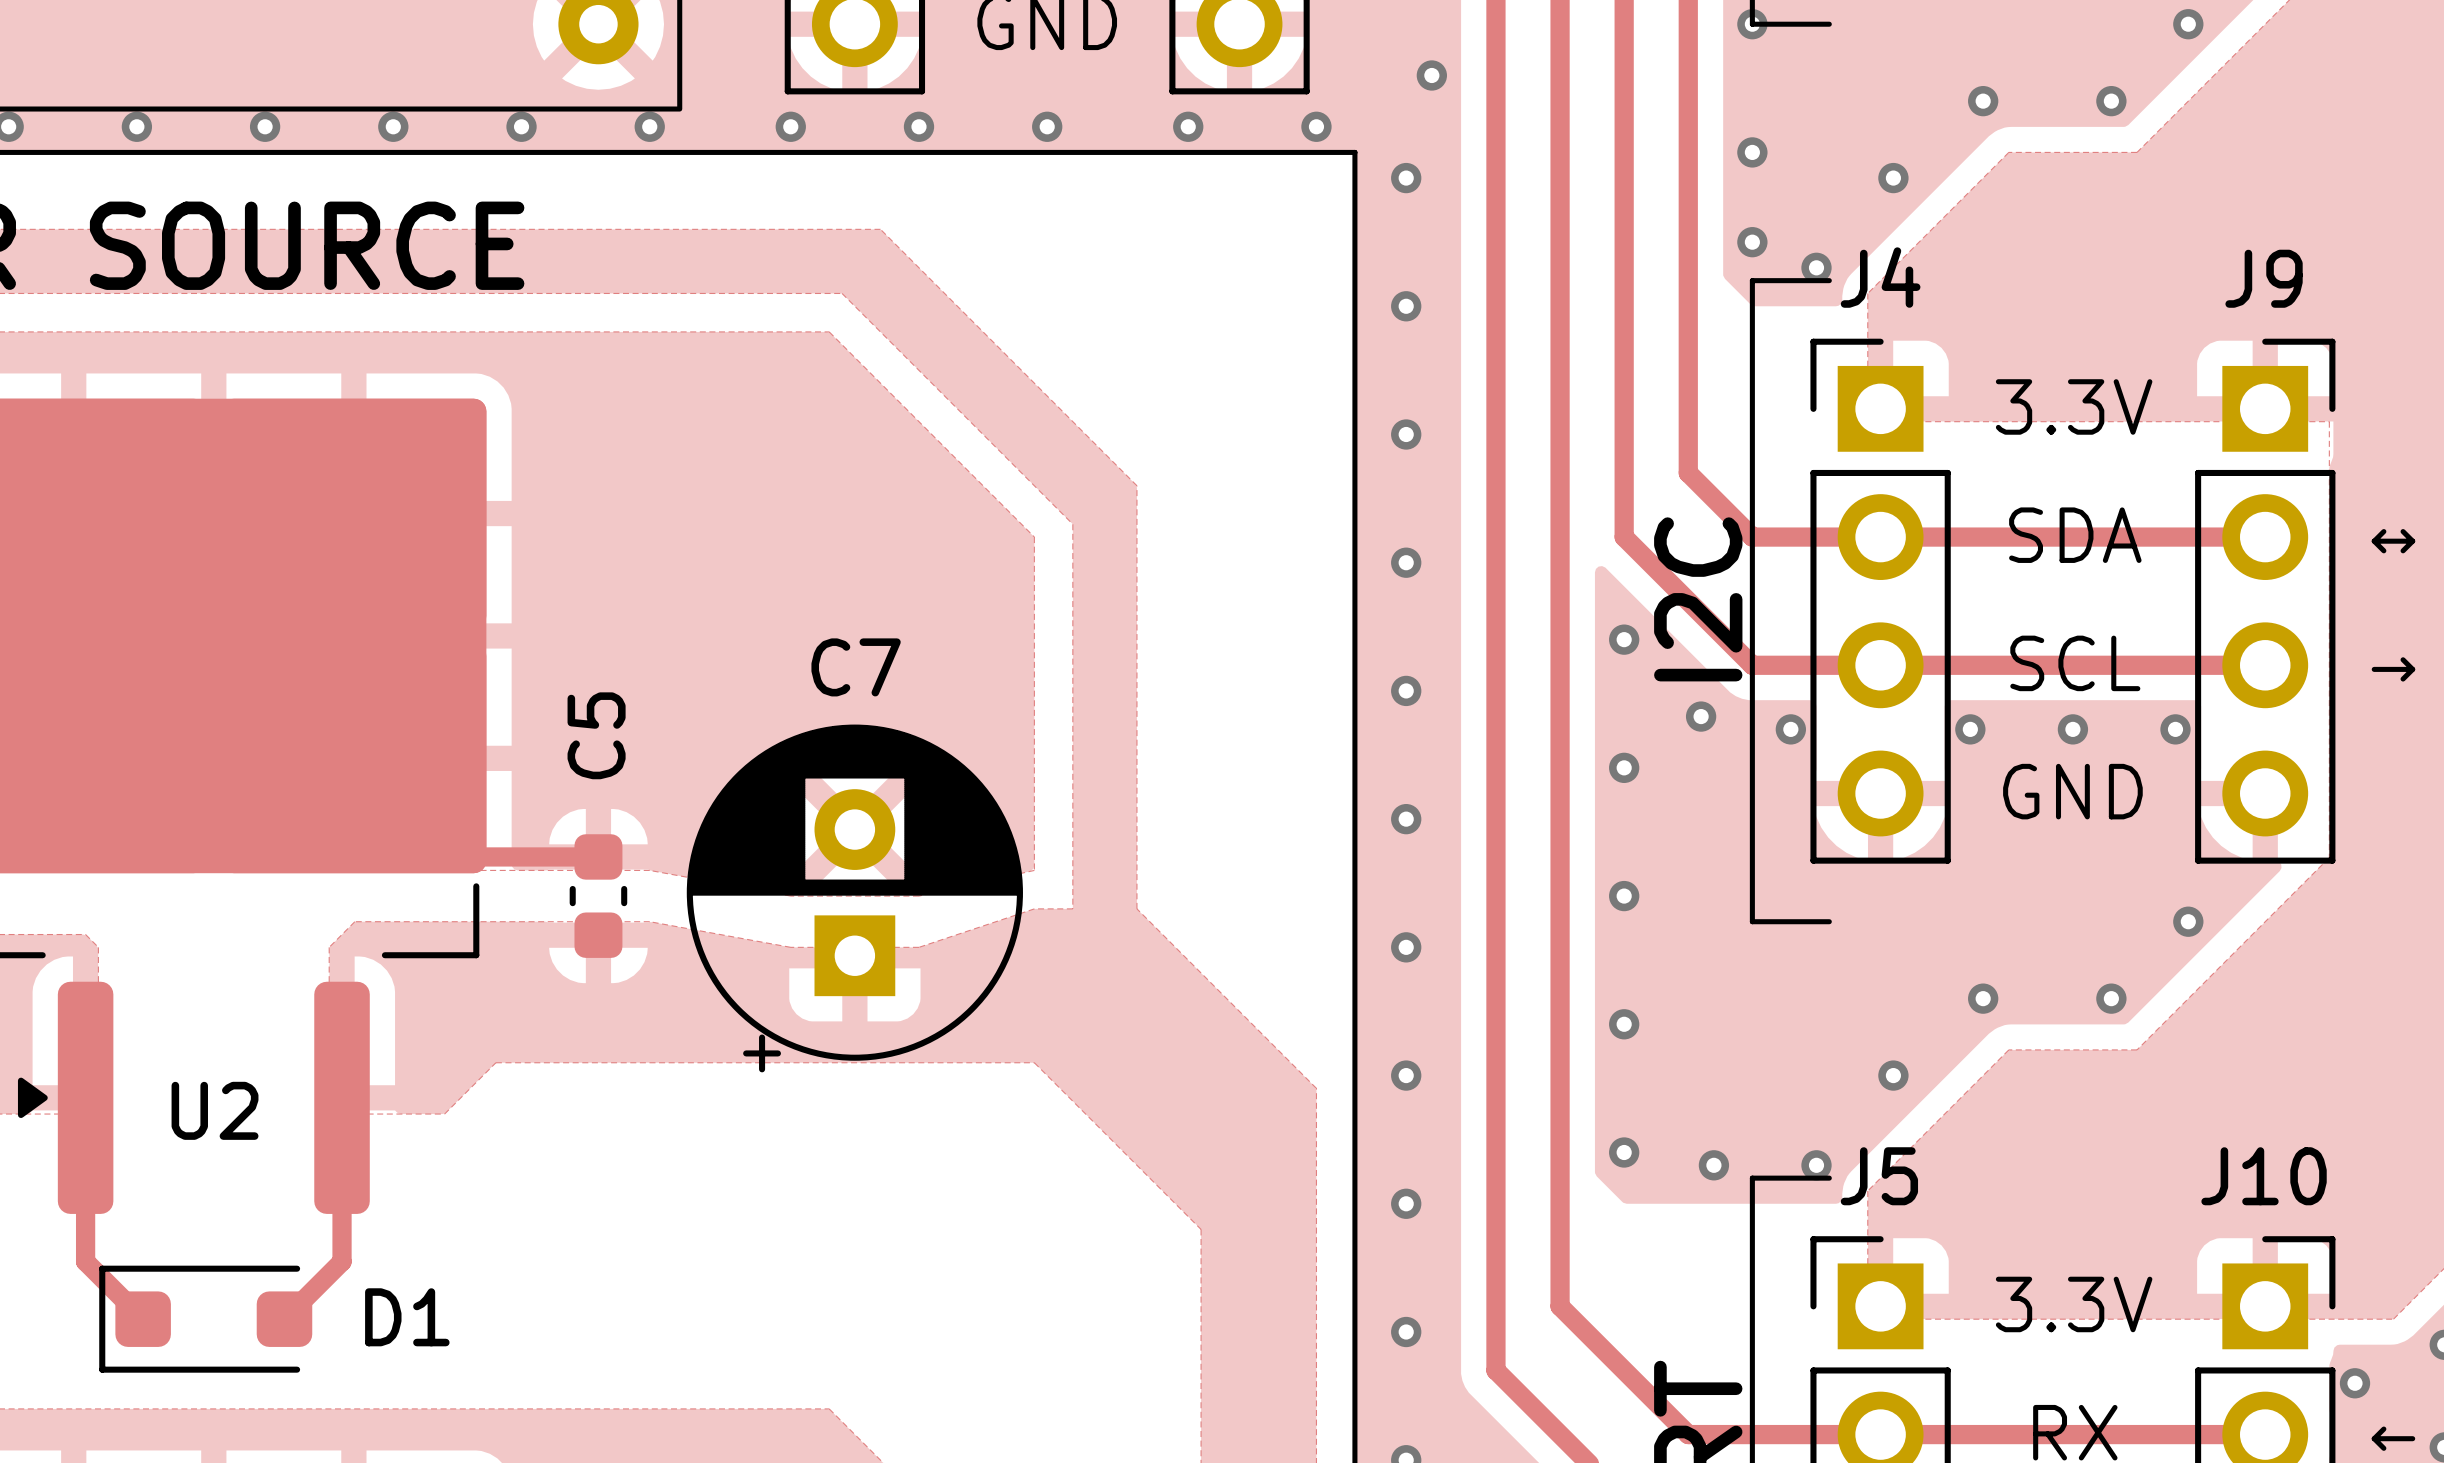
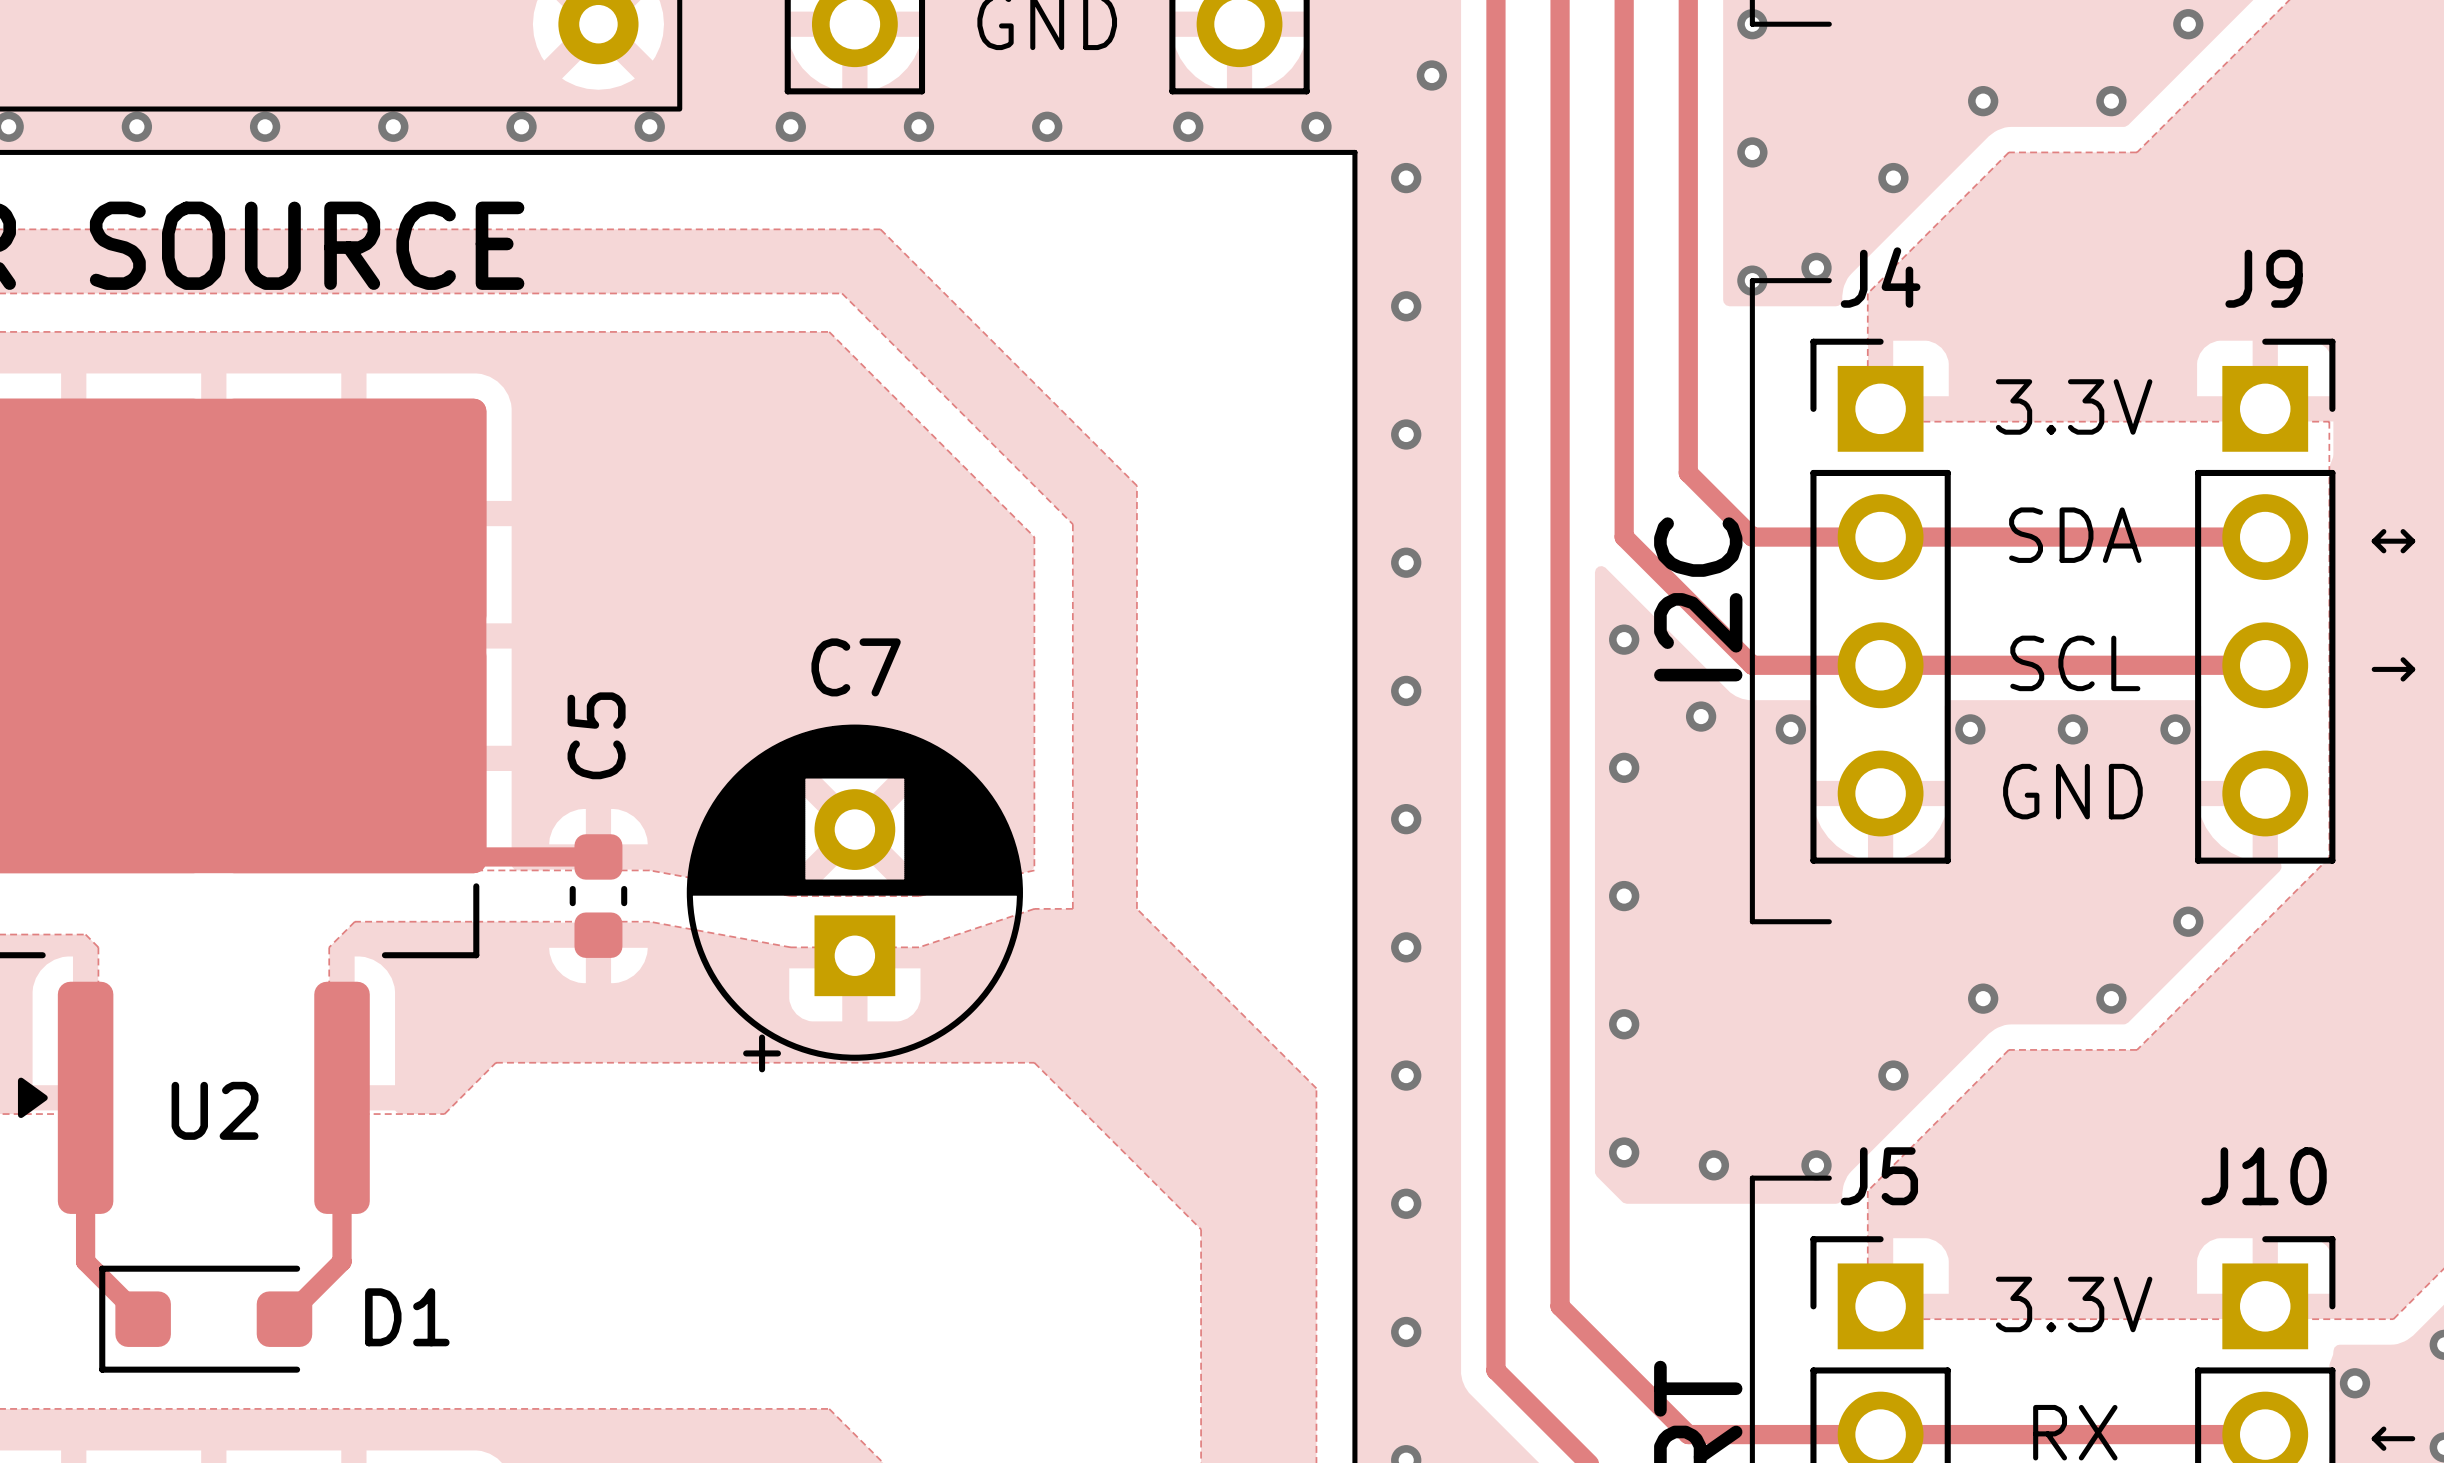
via position: (1752, 242) -> (1752, 280)

